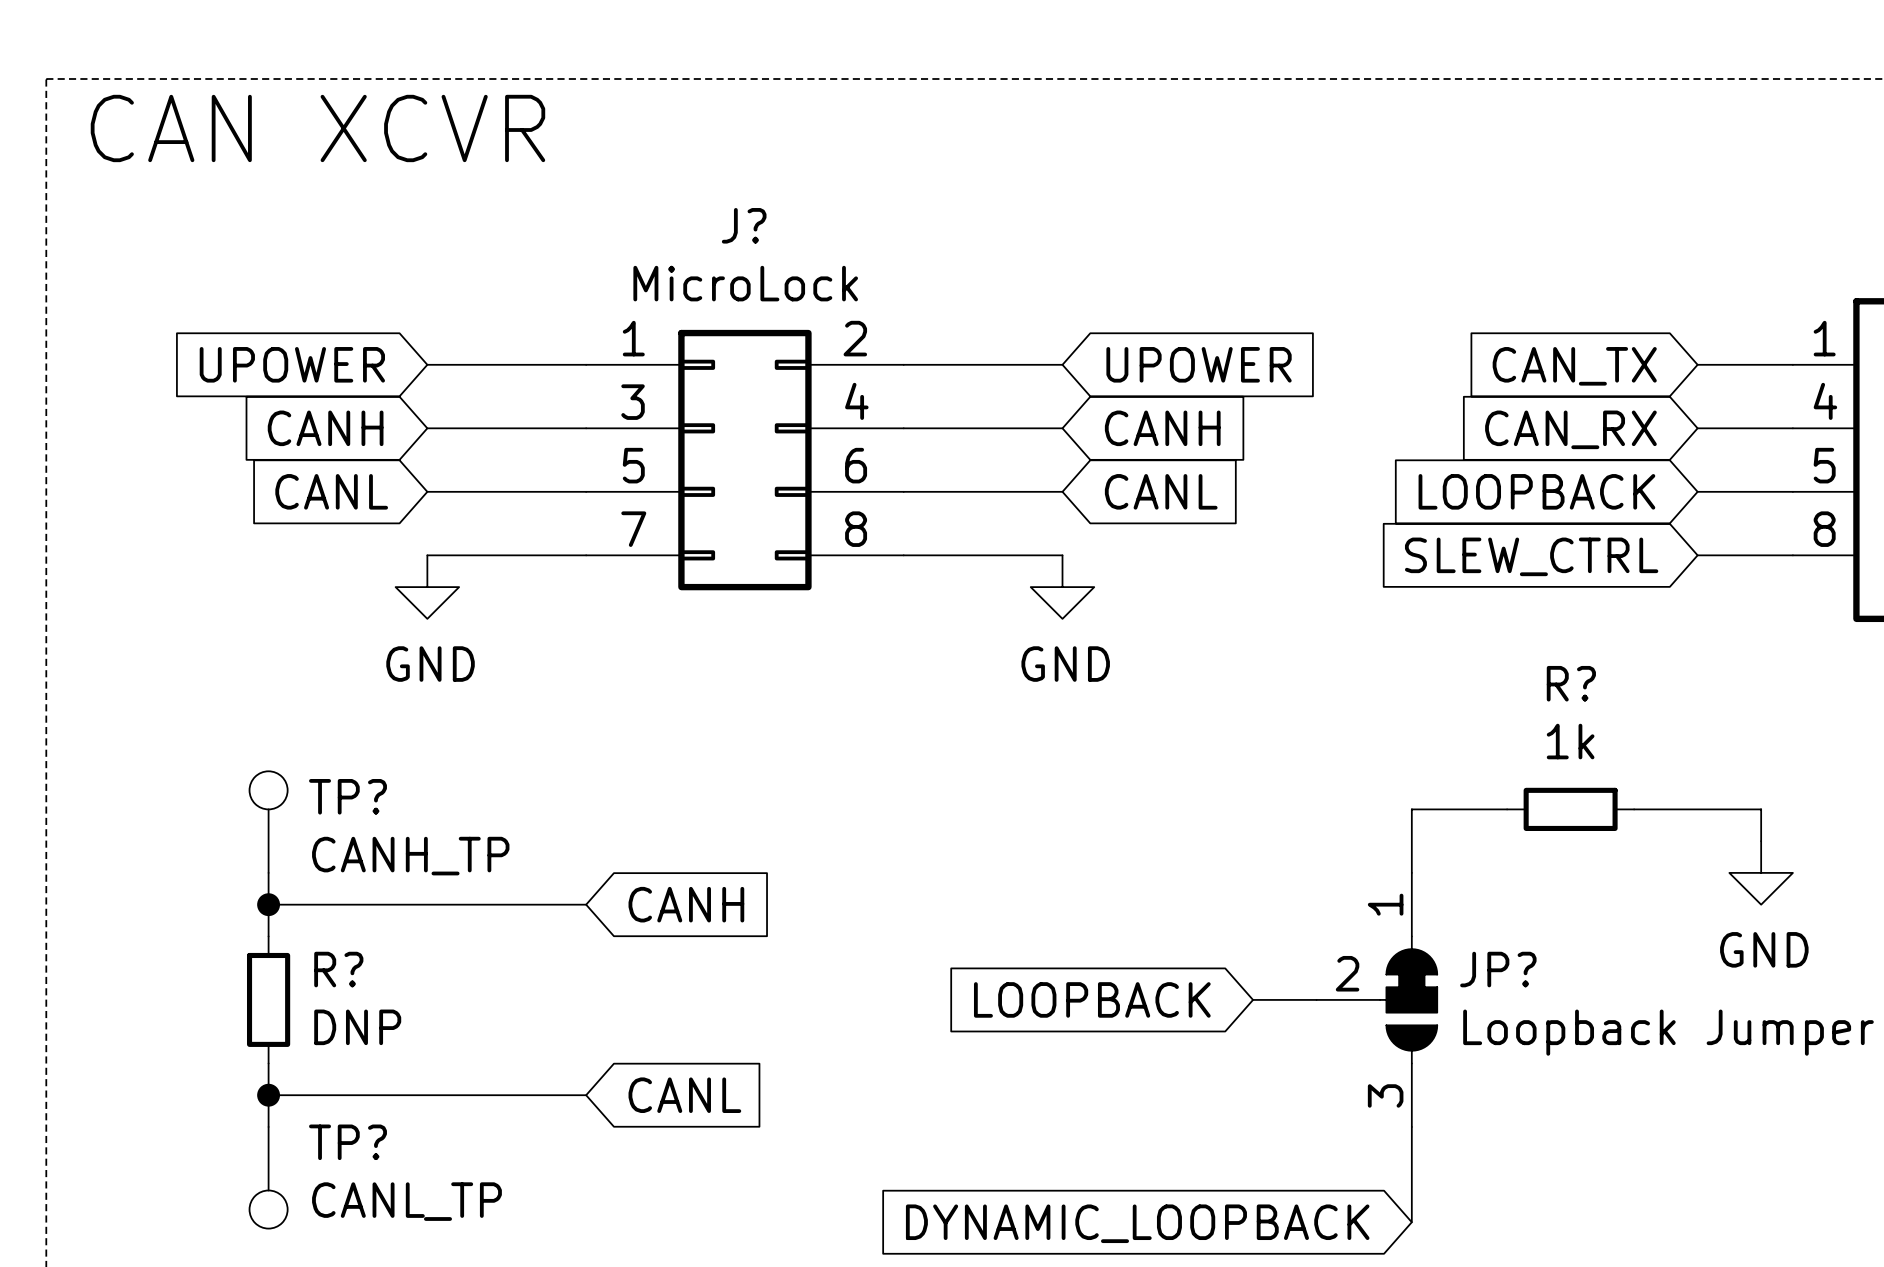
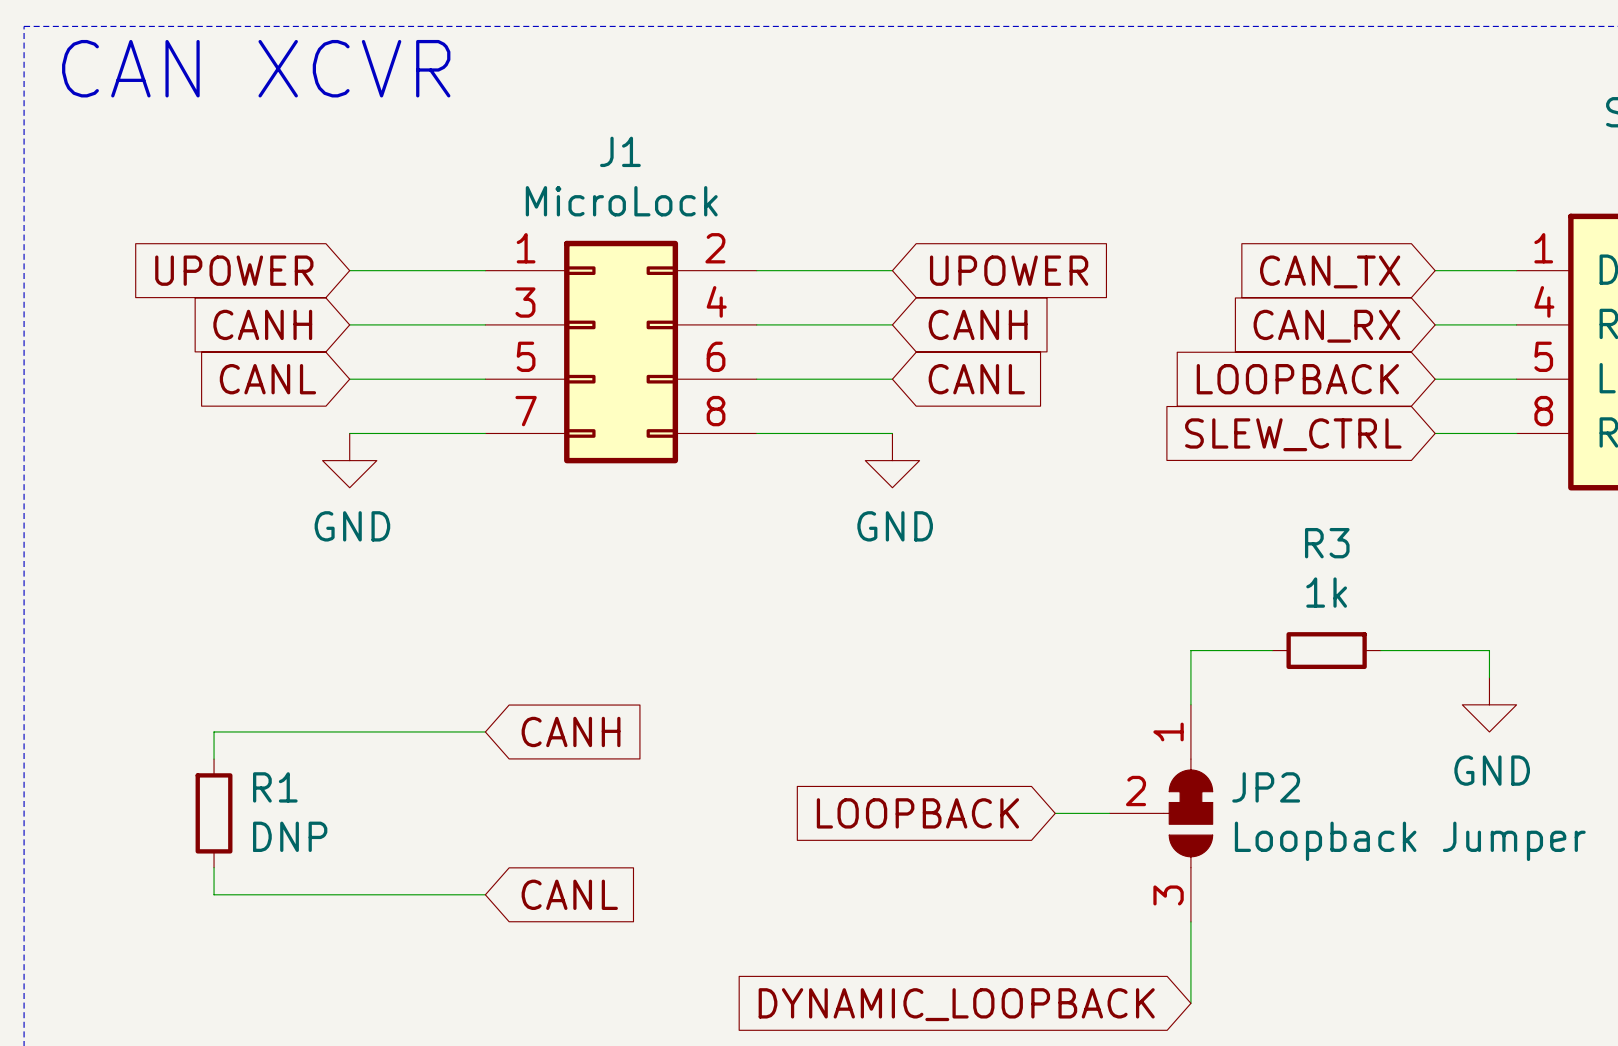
J? name: J? (744, 225) -> J1 (620, 151)
R? name: R? (1571, 683) -> R3 (1327, 543)
TP?: CANH_TP (268, 822) -> none
wire: (268, 872) (268, 904) -> none
junction: (268, 904) -> none
R? name: R? (338, 969) -> R1 (275, 787)
JP? name: JP? (1498, 969) -> JP2 (1266, 787)
wire: (268, 1095) (268, 1126) -> none
junction: (268, 1095) -> none
TP?: CANL_TP (268, 1177) -> none

